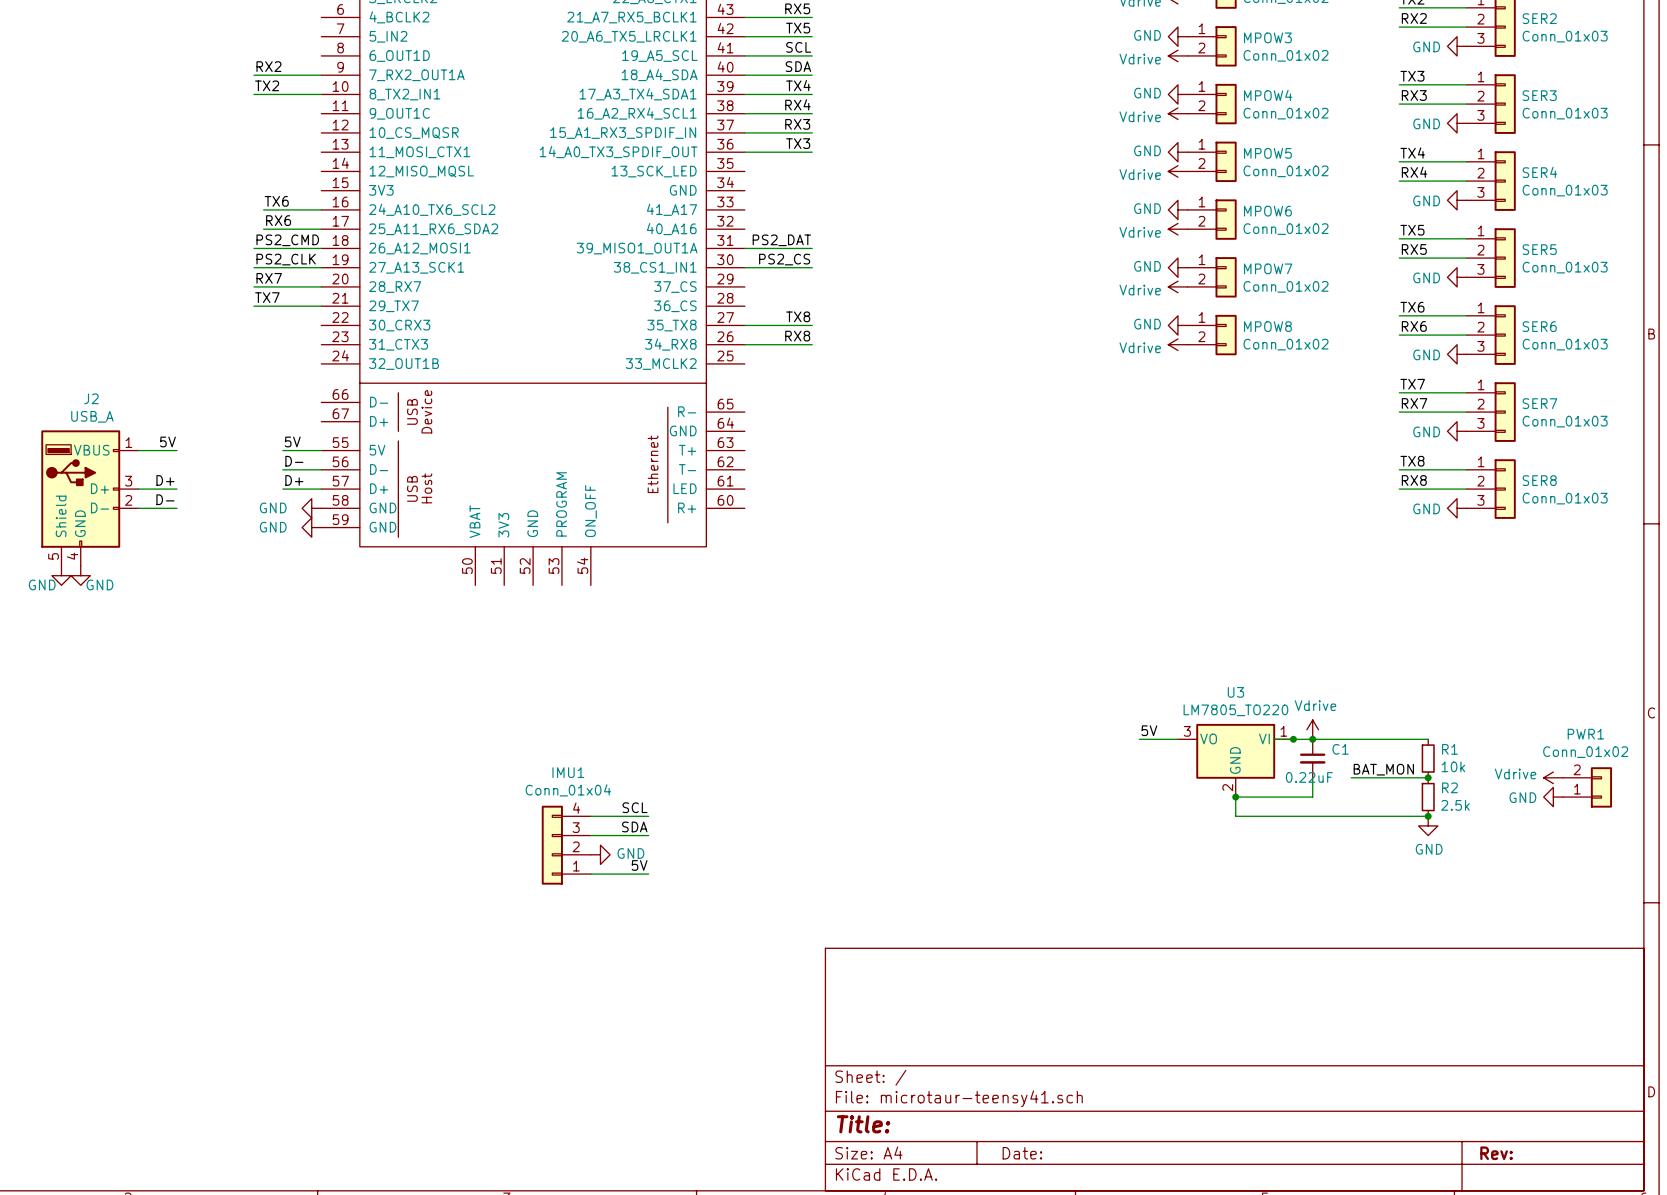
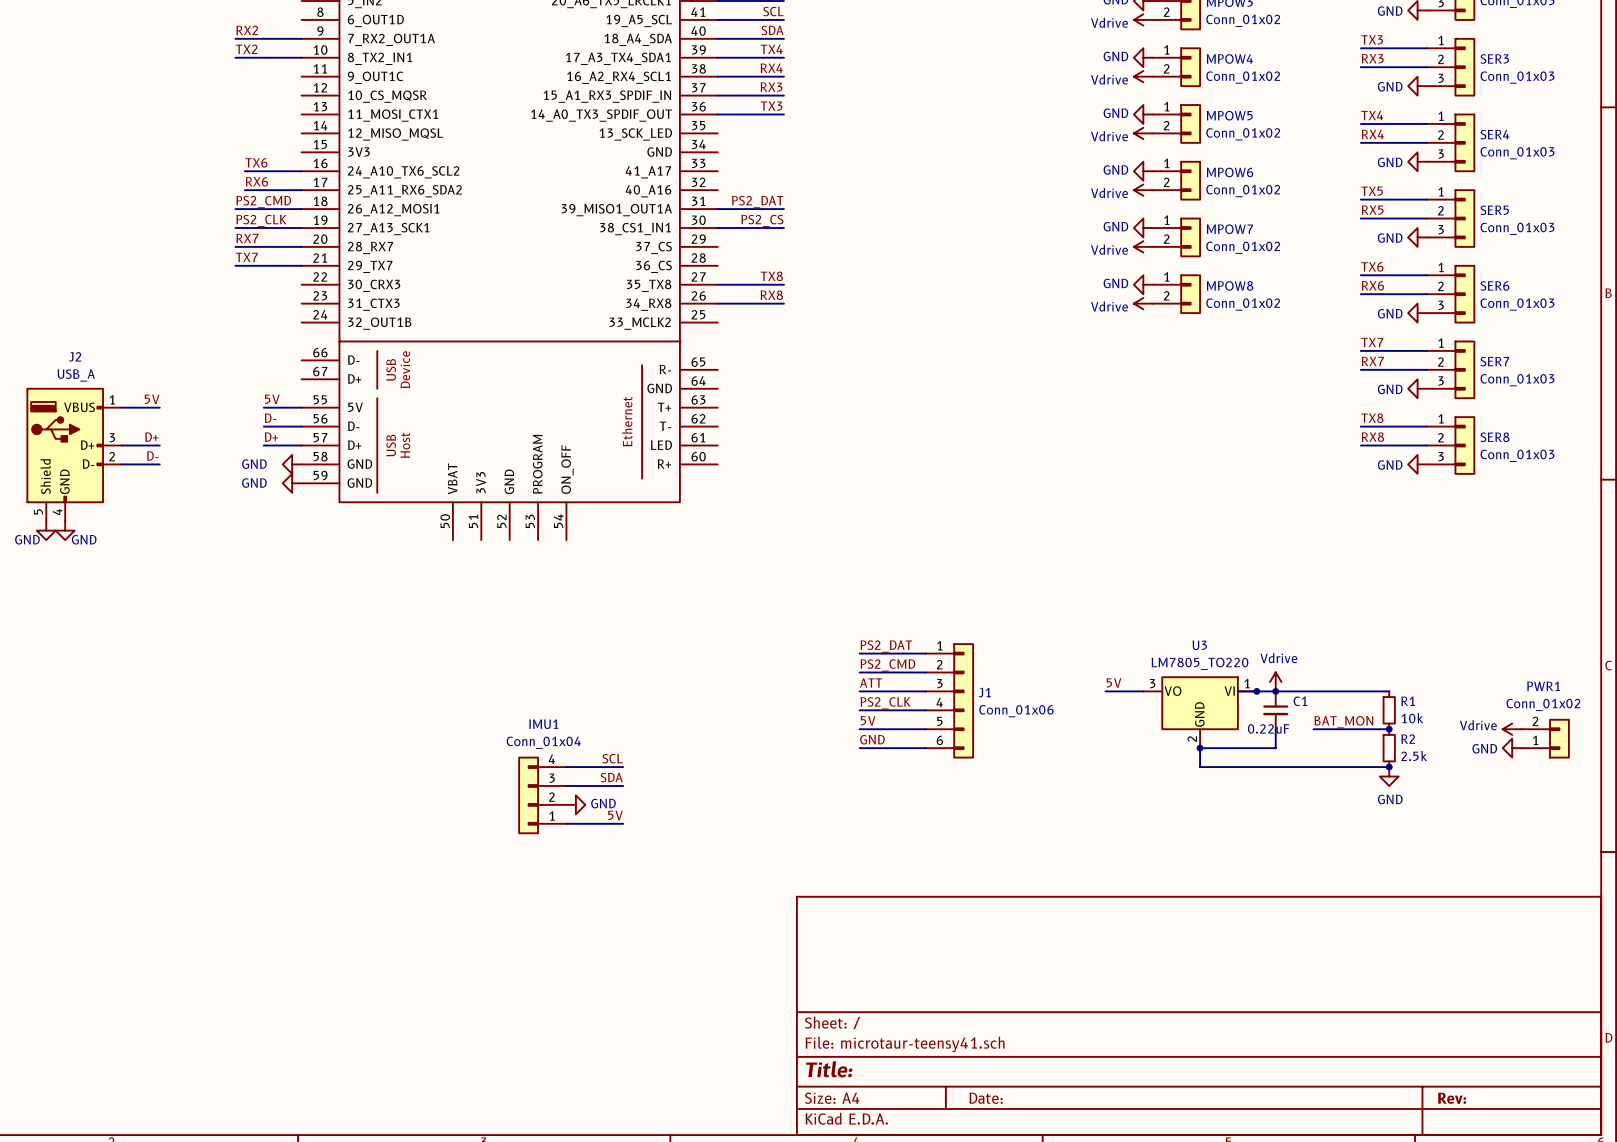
label: none -> PS2_DAT (886, 646)
wire: none -> (859, 653) (925, 653)
label: none -> PS2_CMD (887, 665)
wire: none -> (859, 672) (925, 672)
label: none -> ATT (871, 682)
wire: none -> (859, 691) (925, 691)
J1: none -> Conn_01x06 (949, 700)
label: none -> PS2_CLK (885, 703)
wire: none -> (859, 710) (925, 710)
label: none -> 5V (868, 720)
wire: none -> (859, 729) (925, 729)
label: none -> GND (872, 739)
wire: none -> (859, 748) (925, 748)

